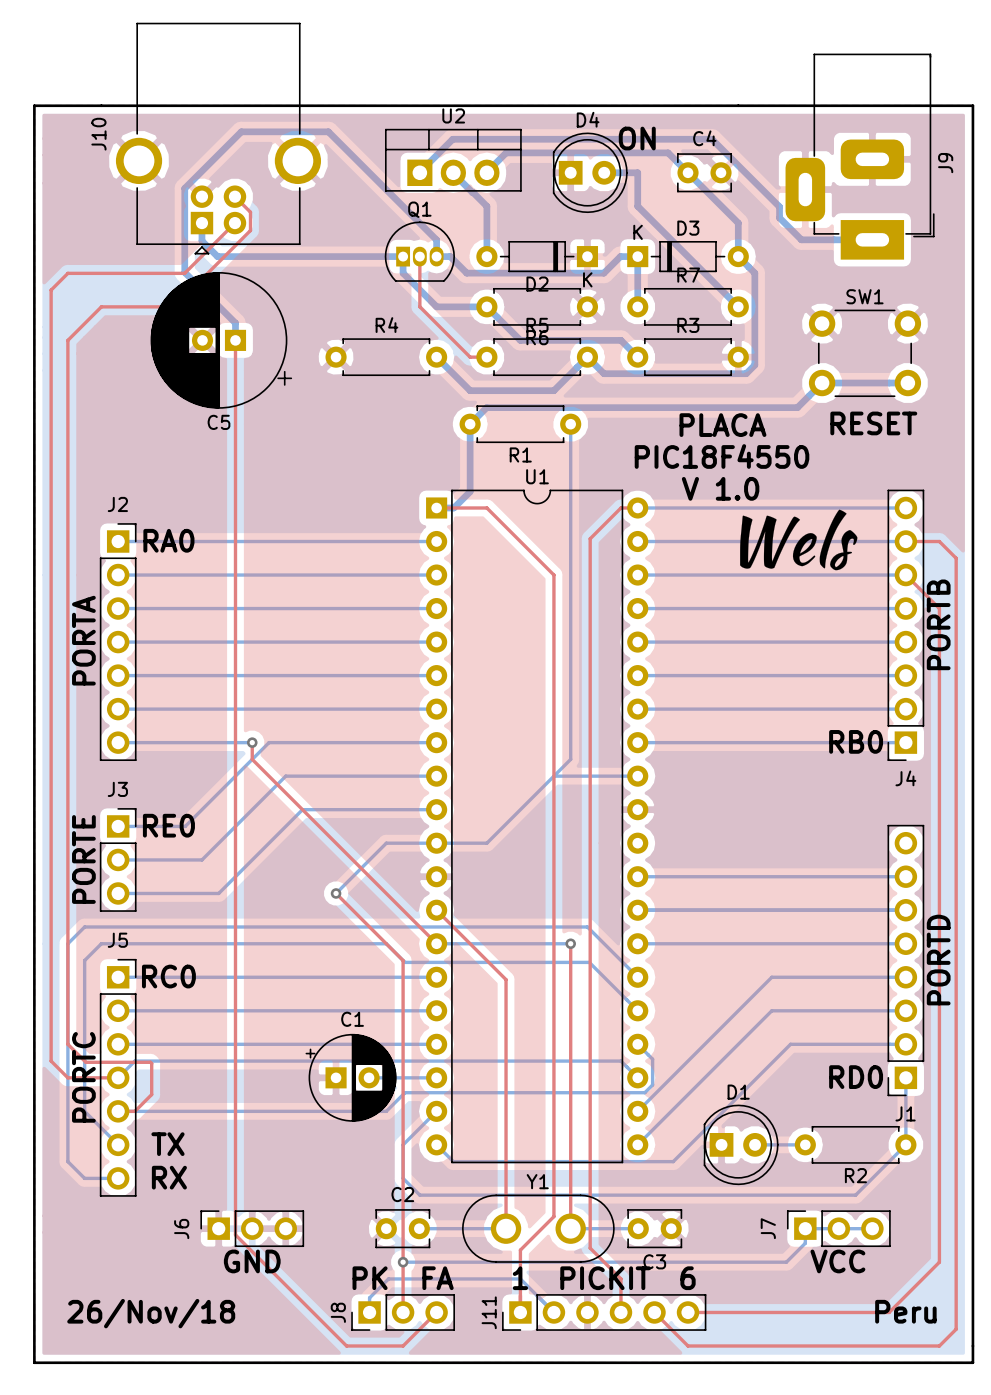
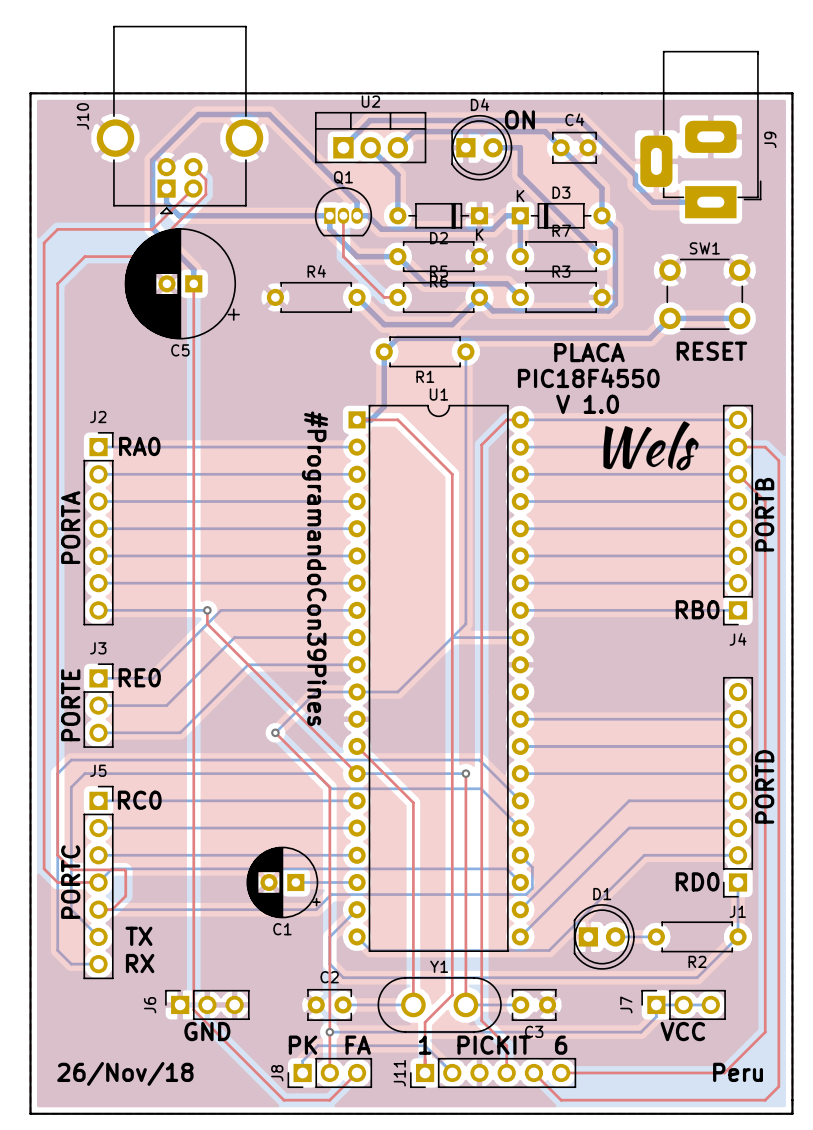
text: none -> #ProgramandoCon39Pines (314, 568)
C1 rotation: 0° (351, 1077) -> 180° (283, 882)

